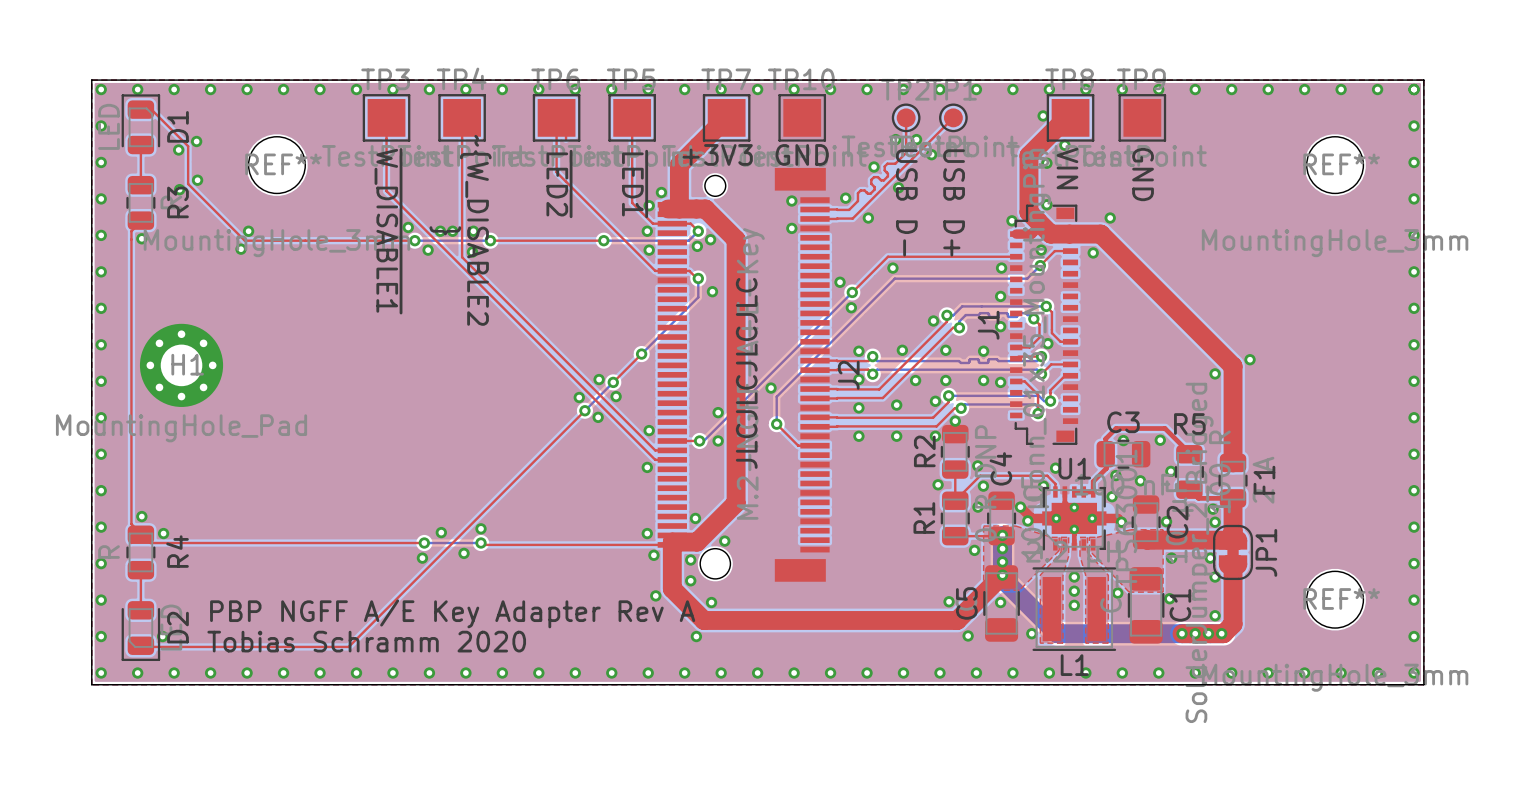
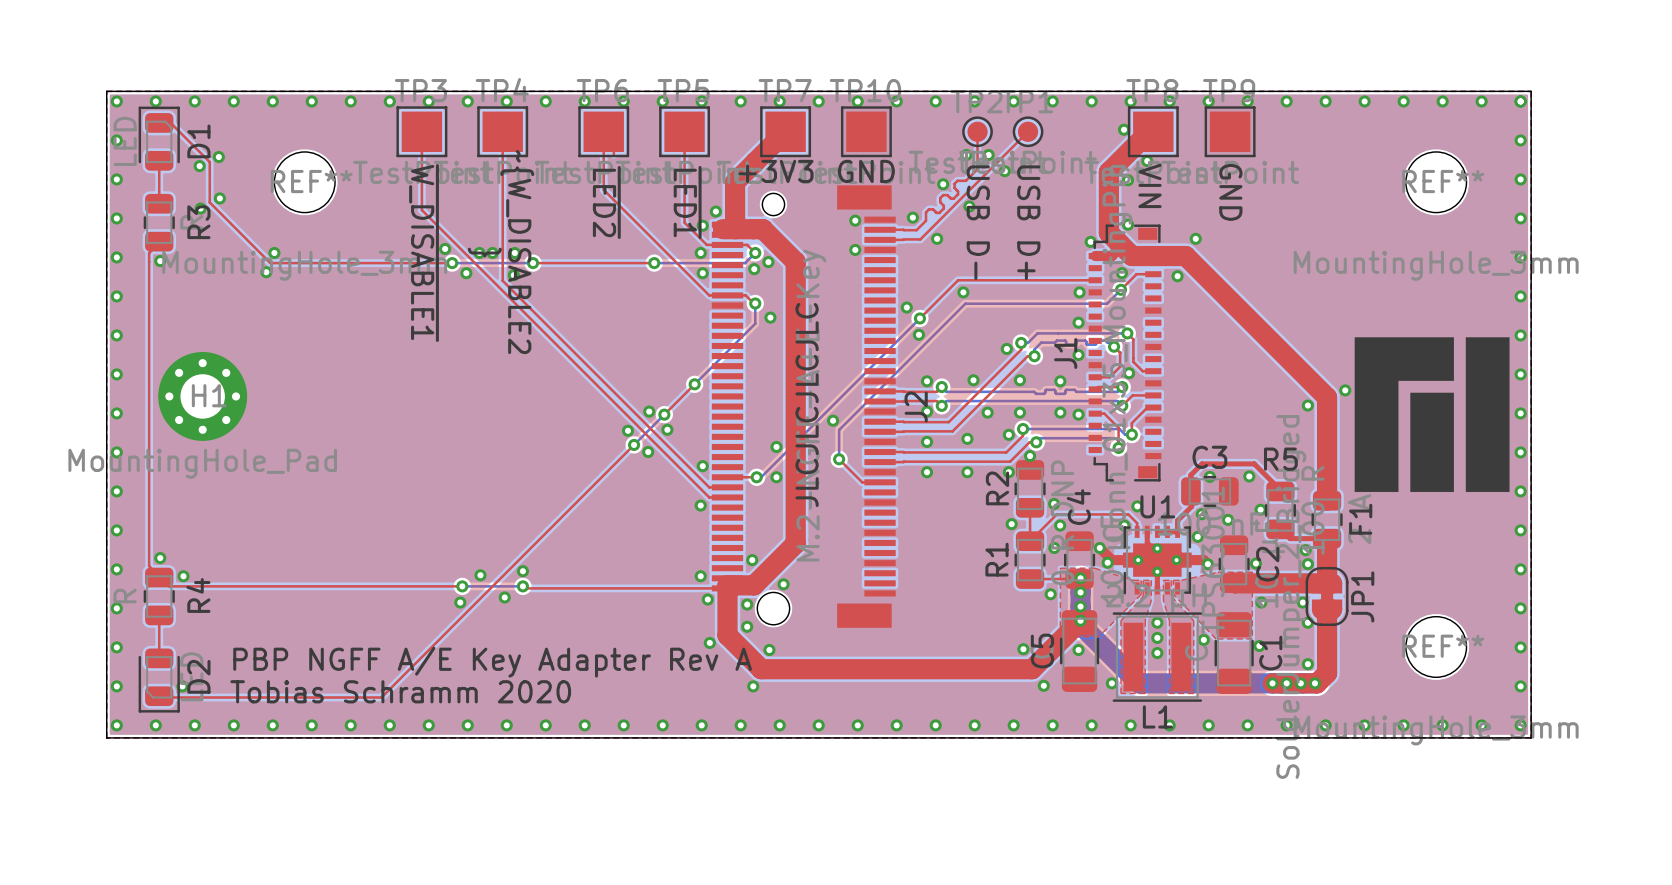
drawing: none -> [1354, 337, 1510, 493]

